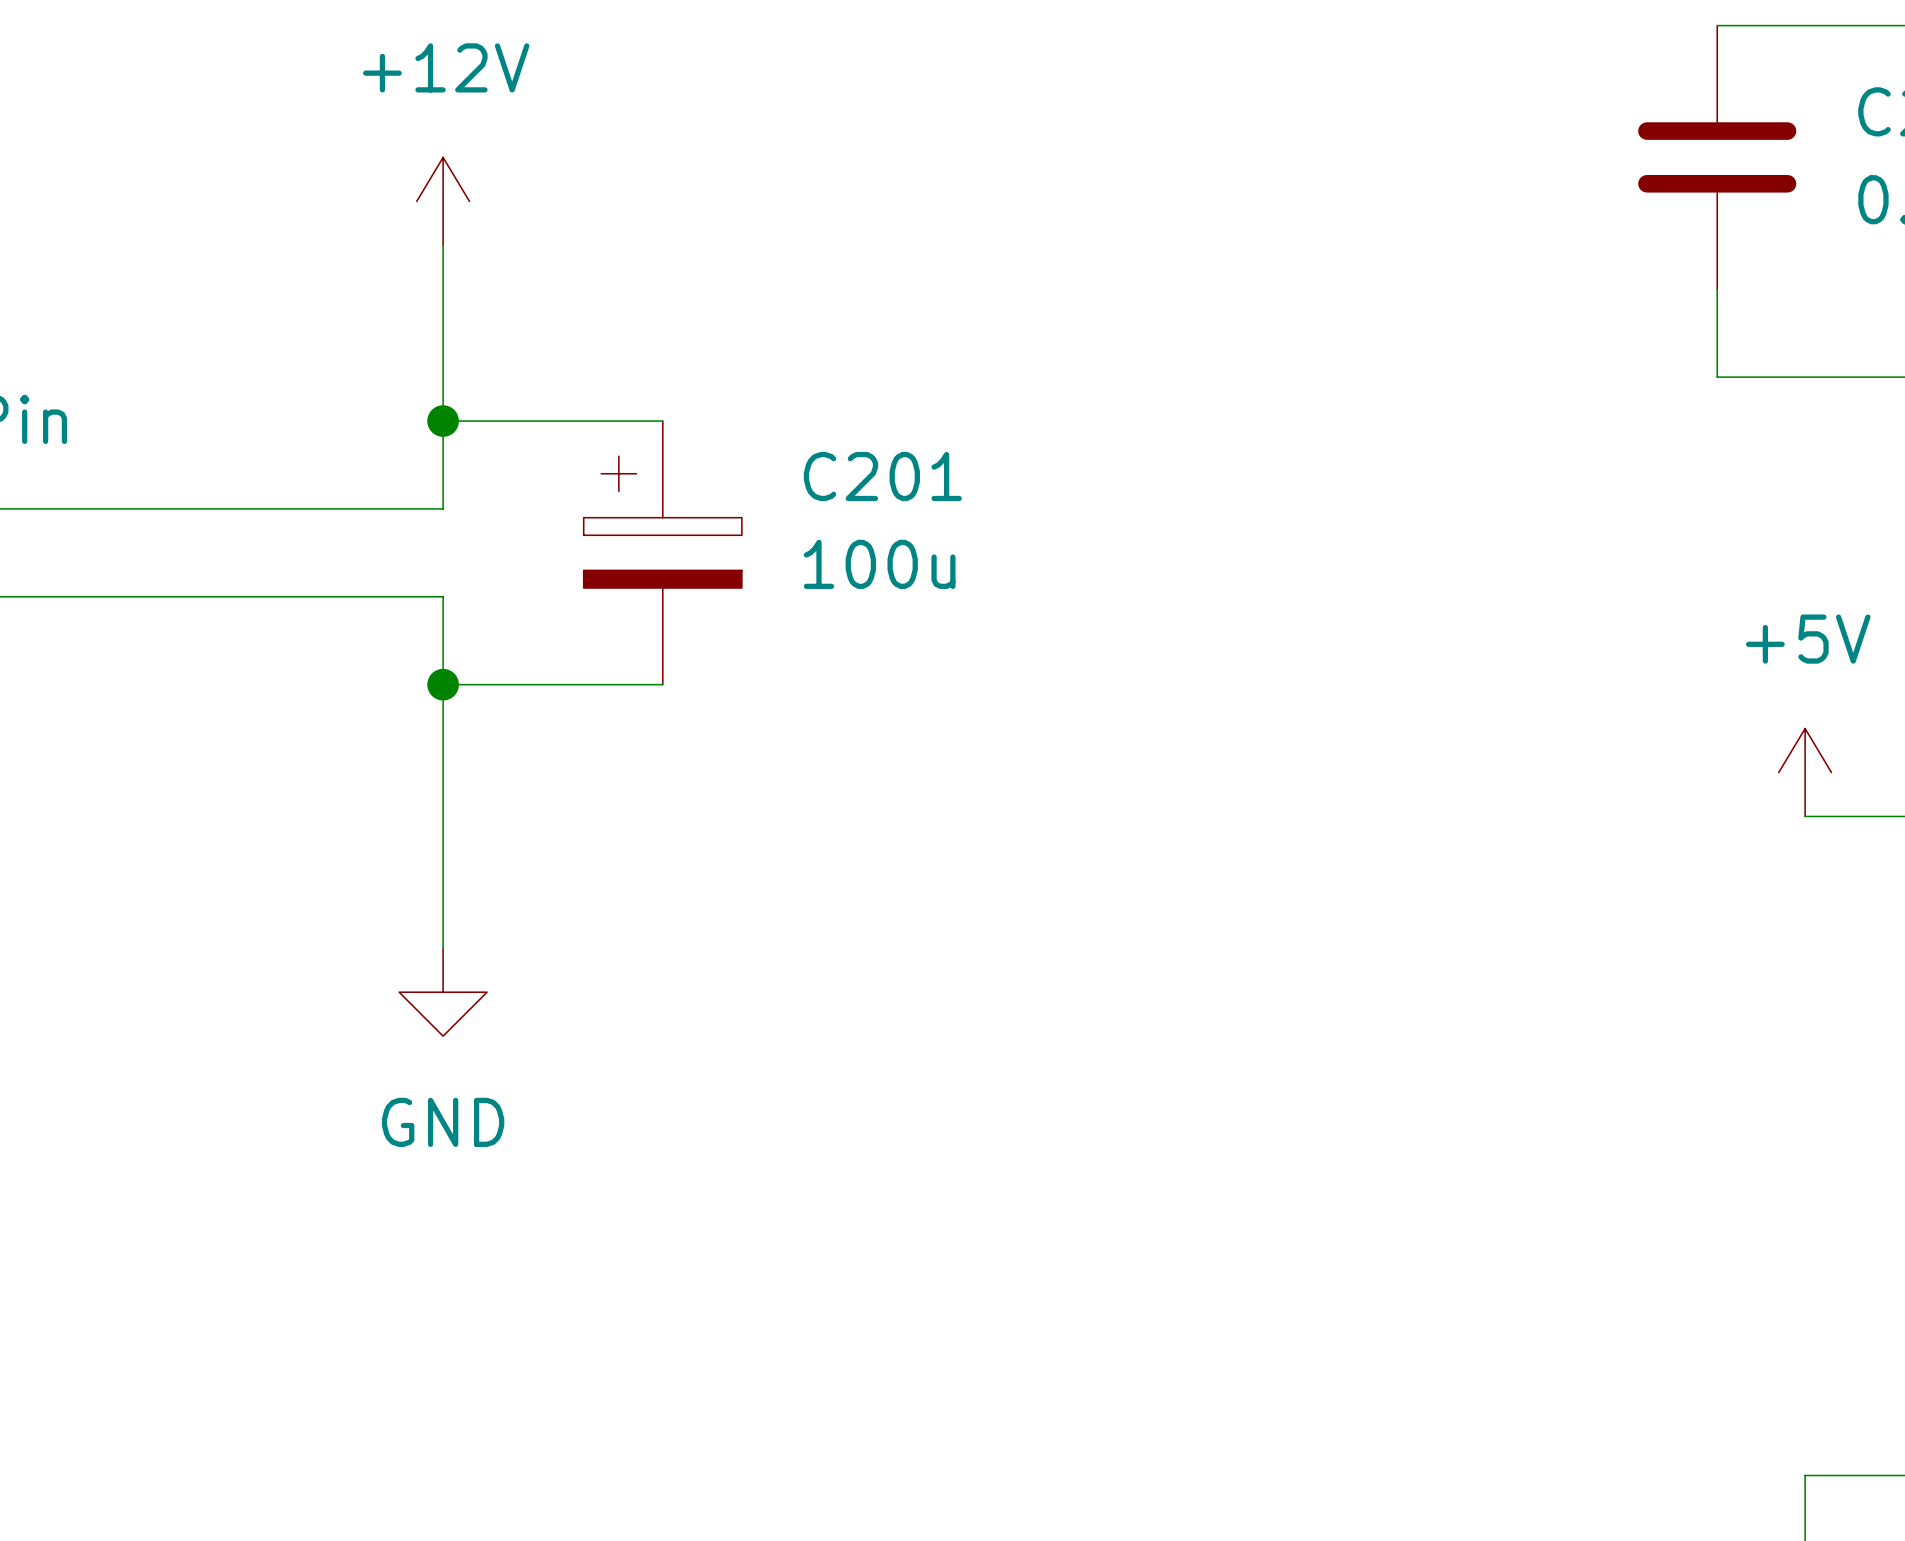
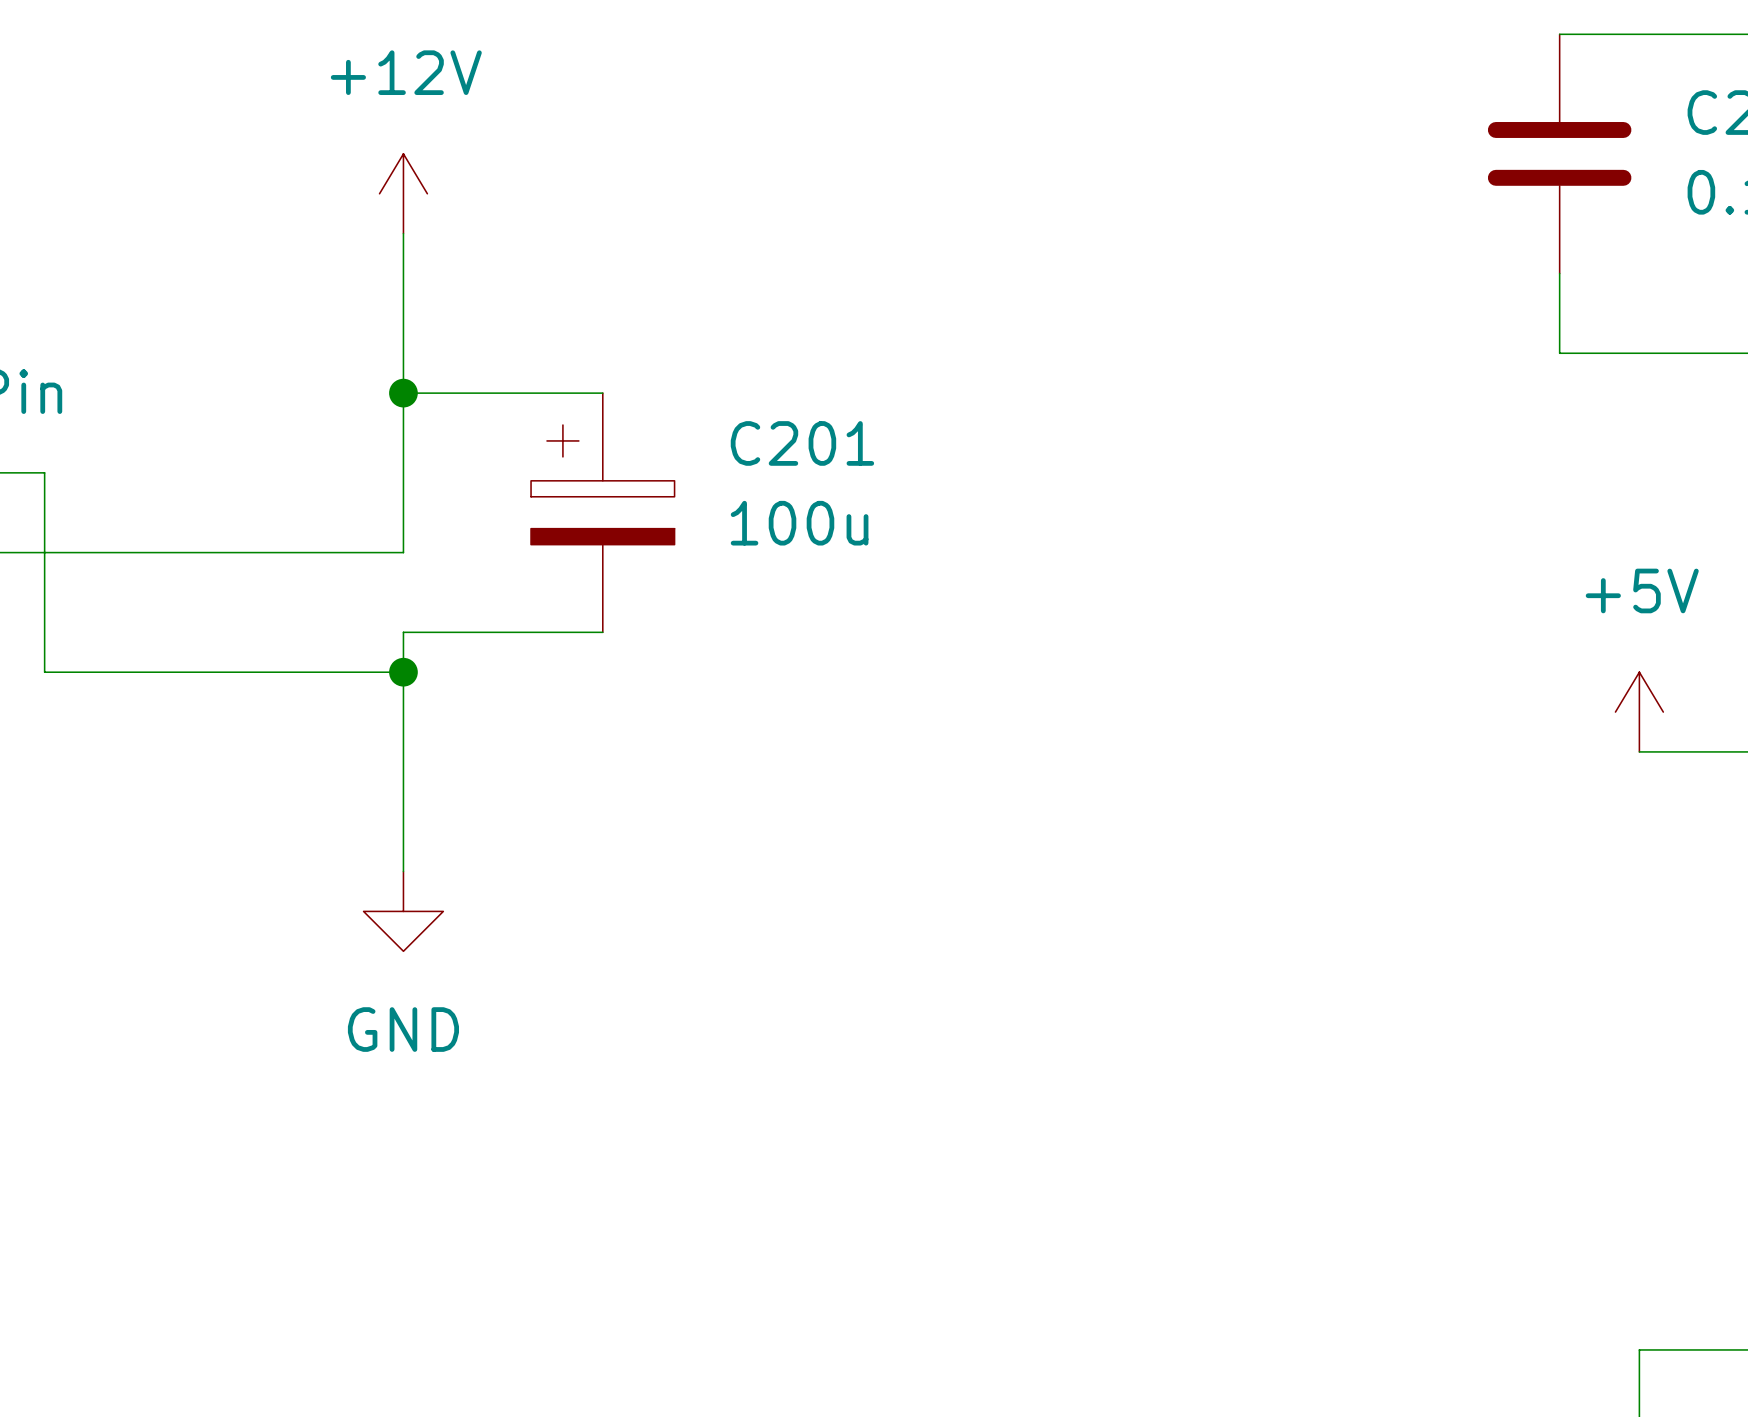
wire: (47, 508) (443, 508) -> (44, 472) (44, 672) (403, 672)
wire: (443, 596) (443, 684) -> (403, 552) (403, 472)
junction position: (443, 684) -> (403, 672)

